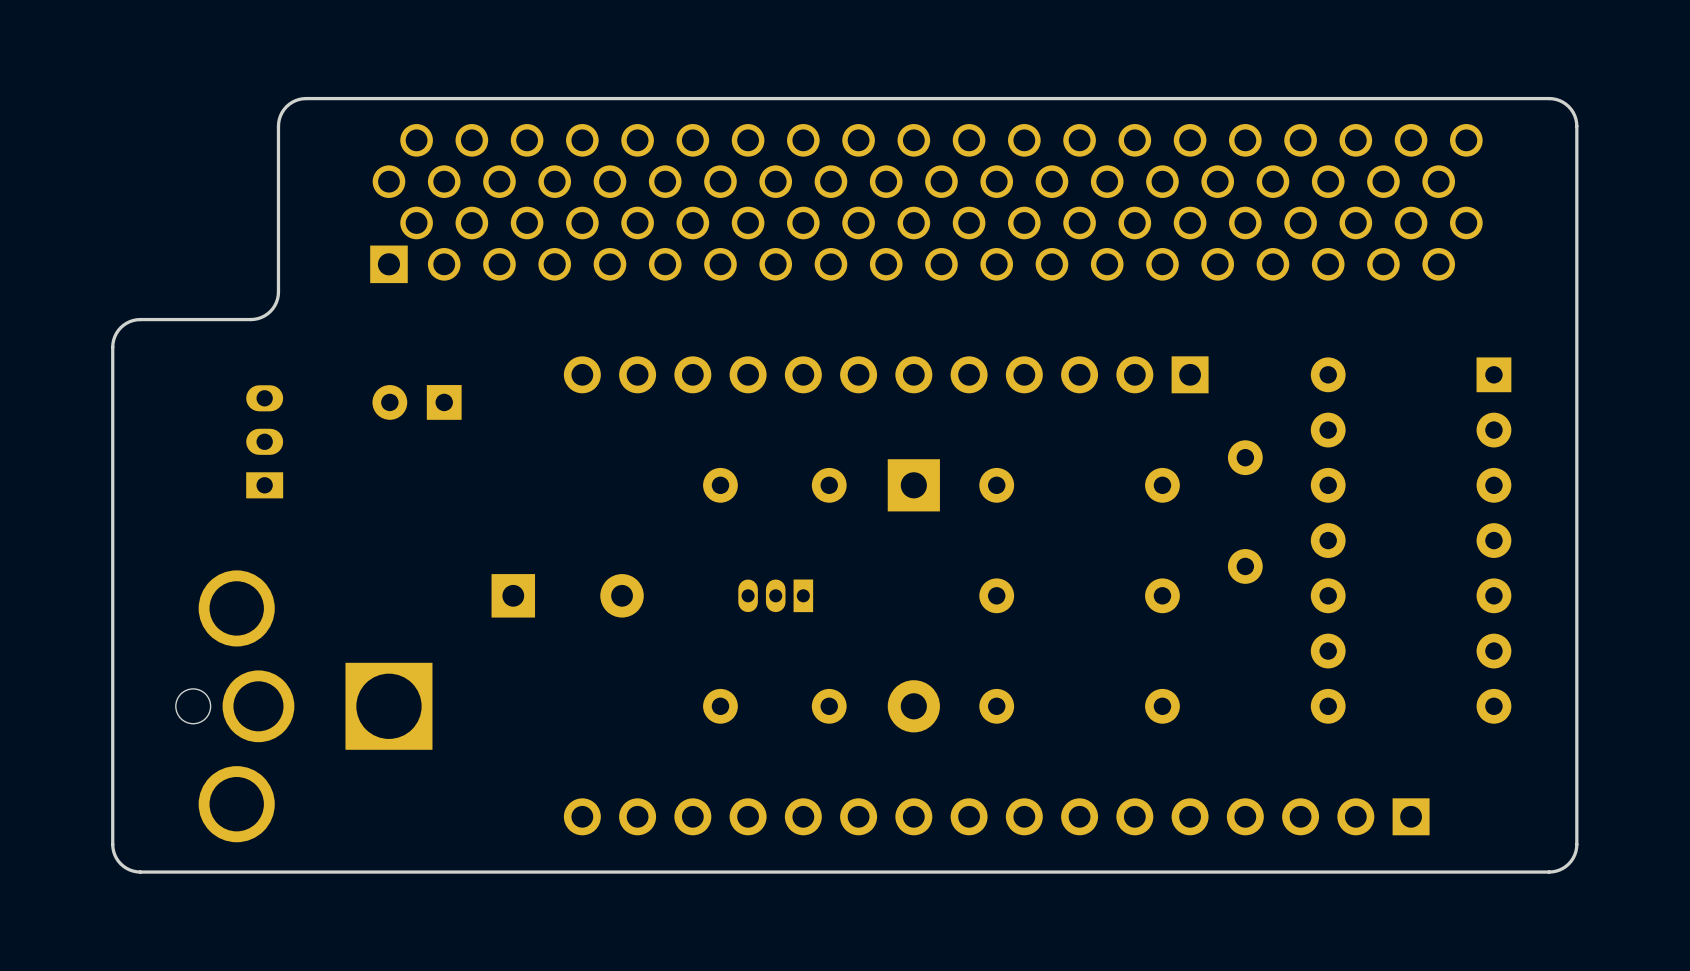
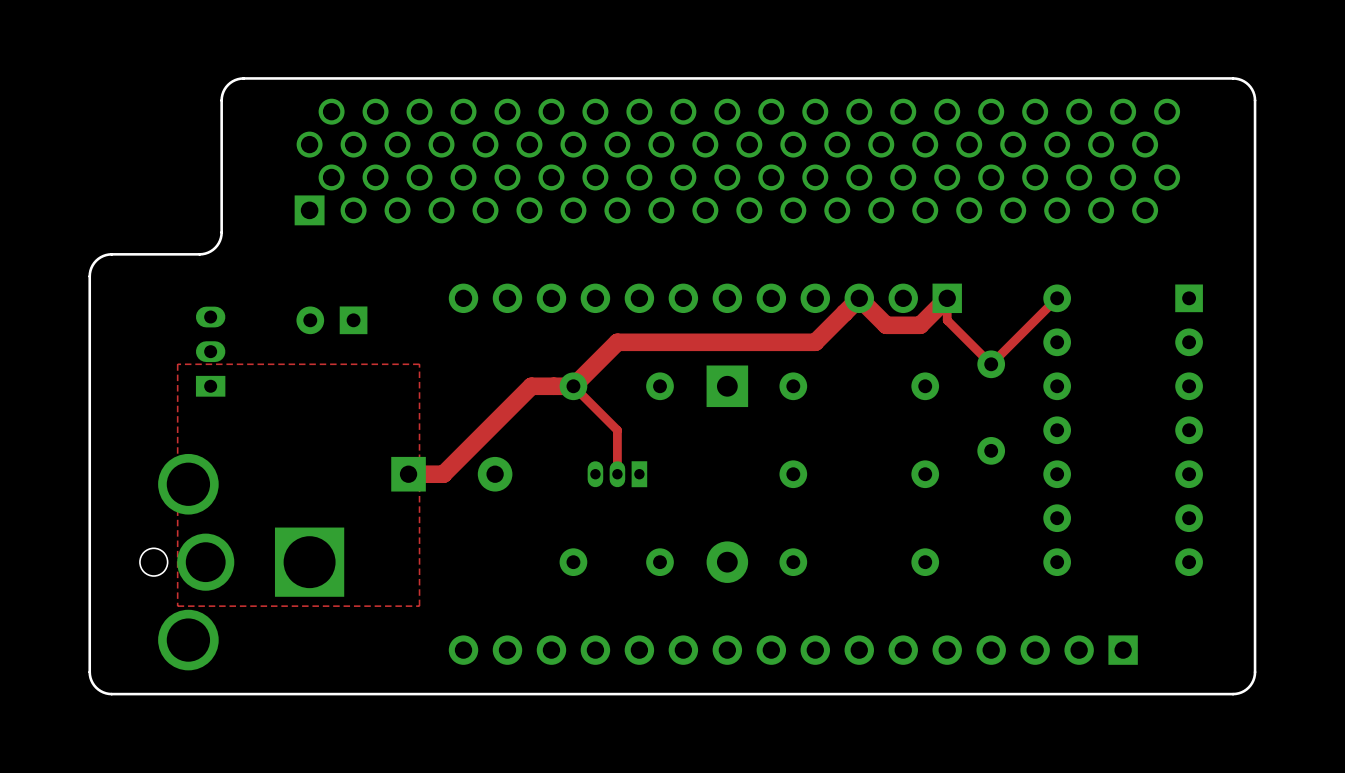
top track: none -> (1057, 298) (991, 364) (947, 320) (947, 298) (920, 325) (886, 325) (859, 298) (815, 342) (617, 342) (573, 386)
top zone outline: none -> (419, 364) (419, 606) (177, 606) (177, 364) (419, 364)
top track: none -> (573, 386) (617, 430) (617, 474)
top track: none -> (573, 386) (531, 386) (443, 474) (408, 474)

